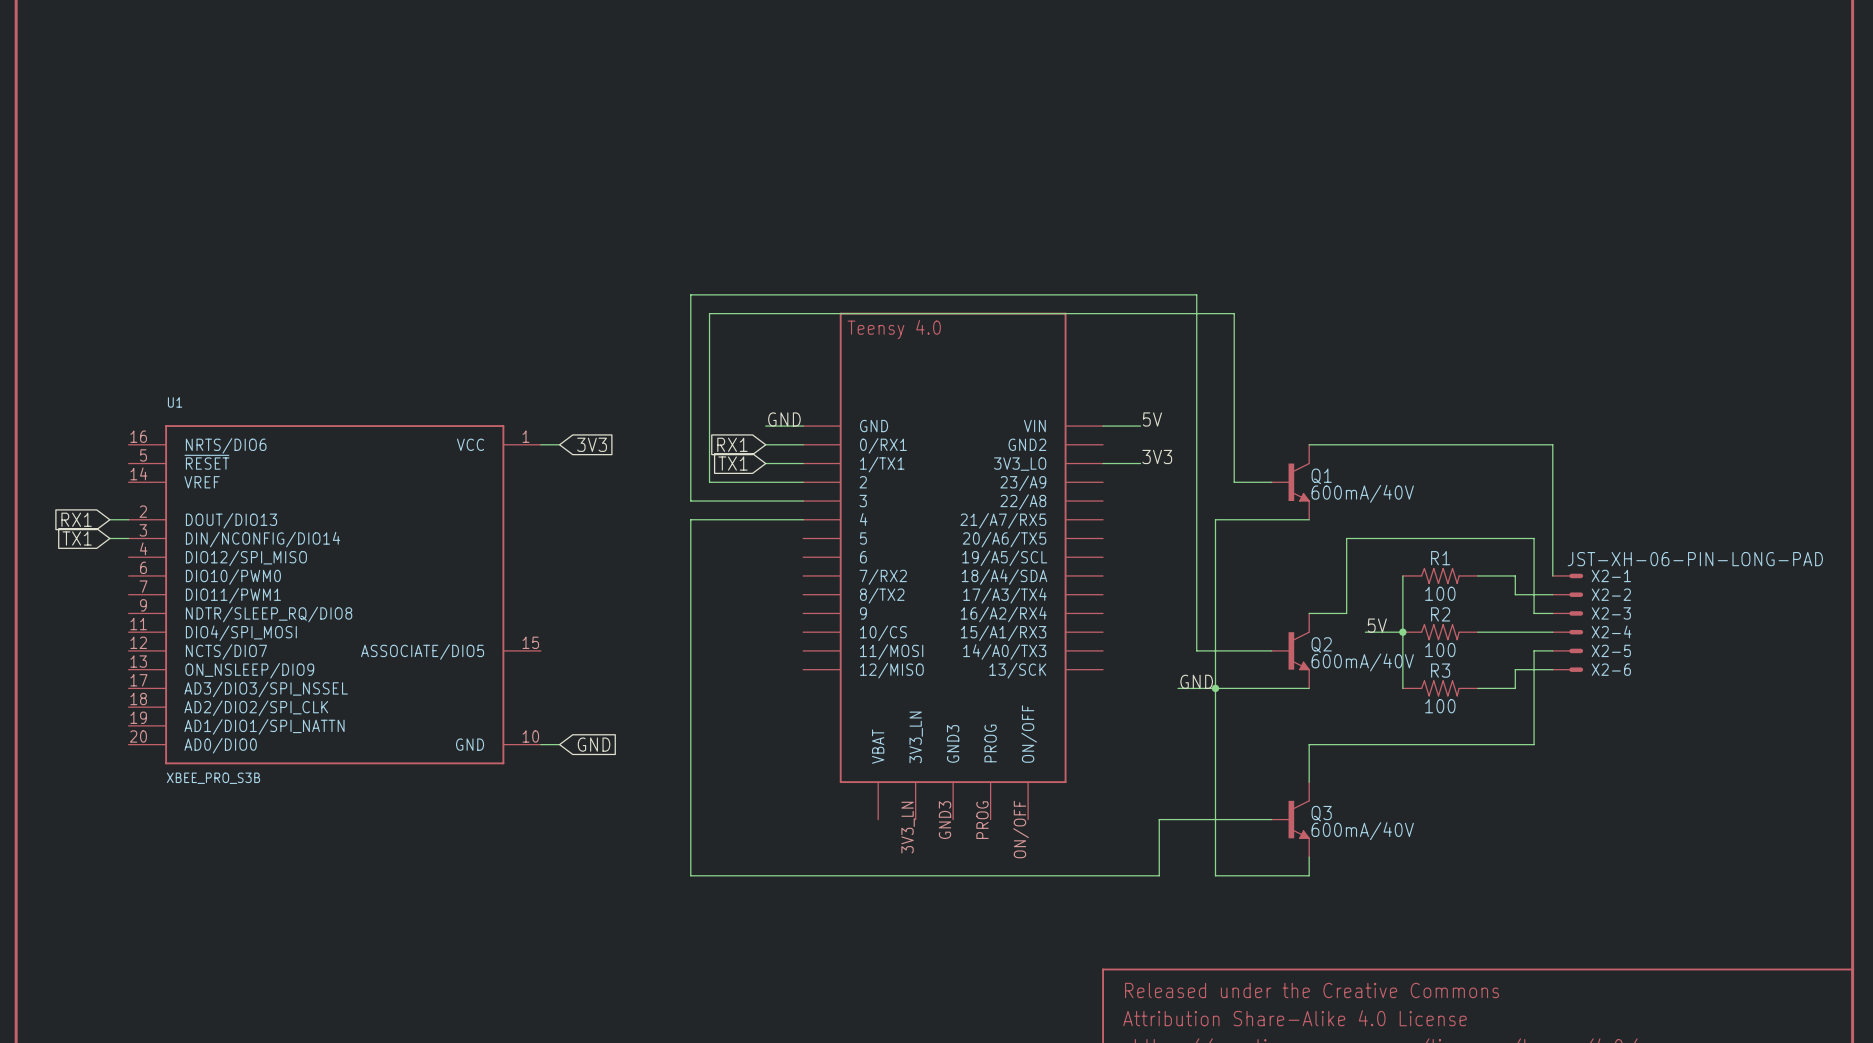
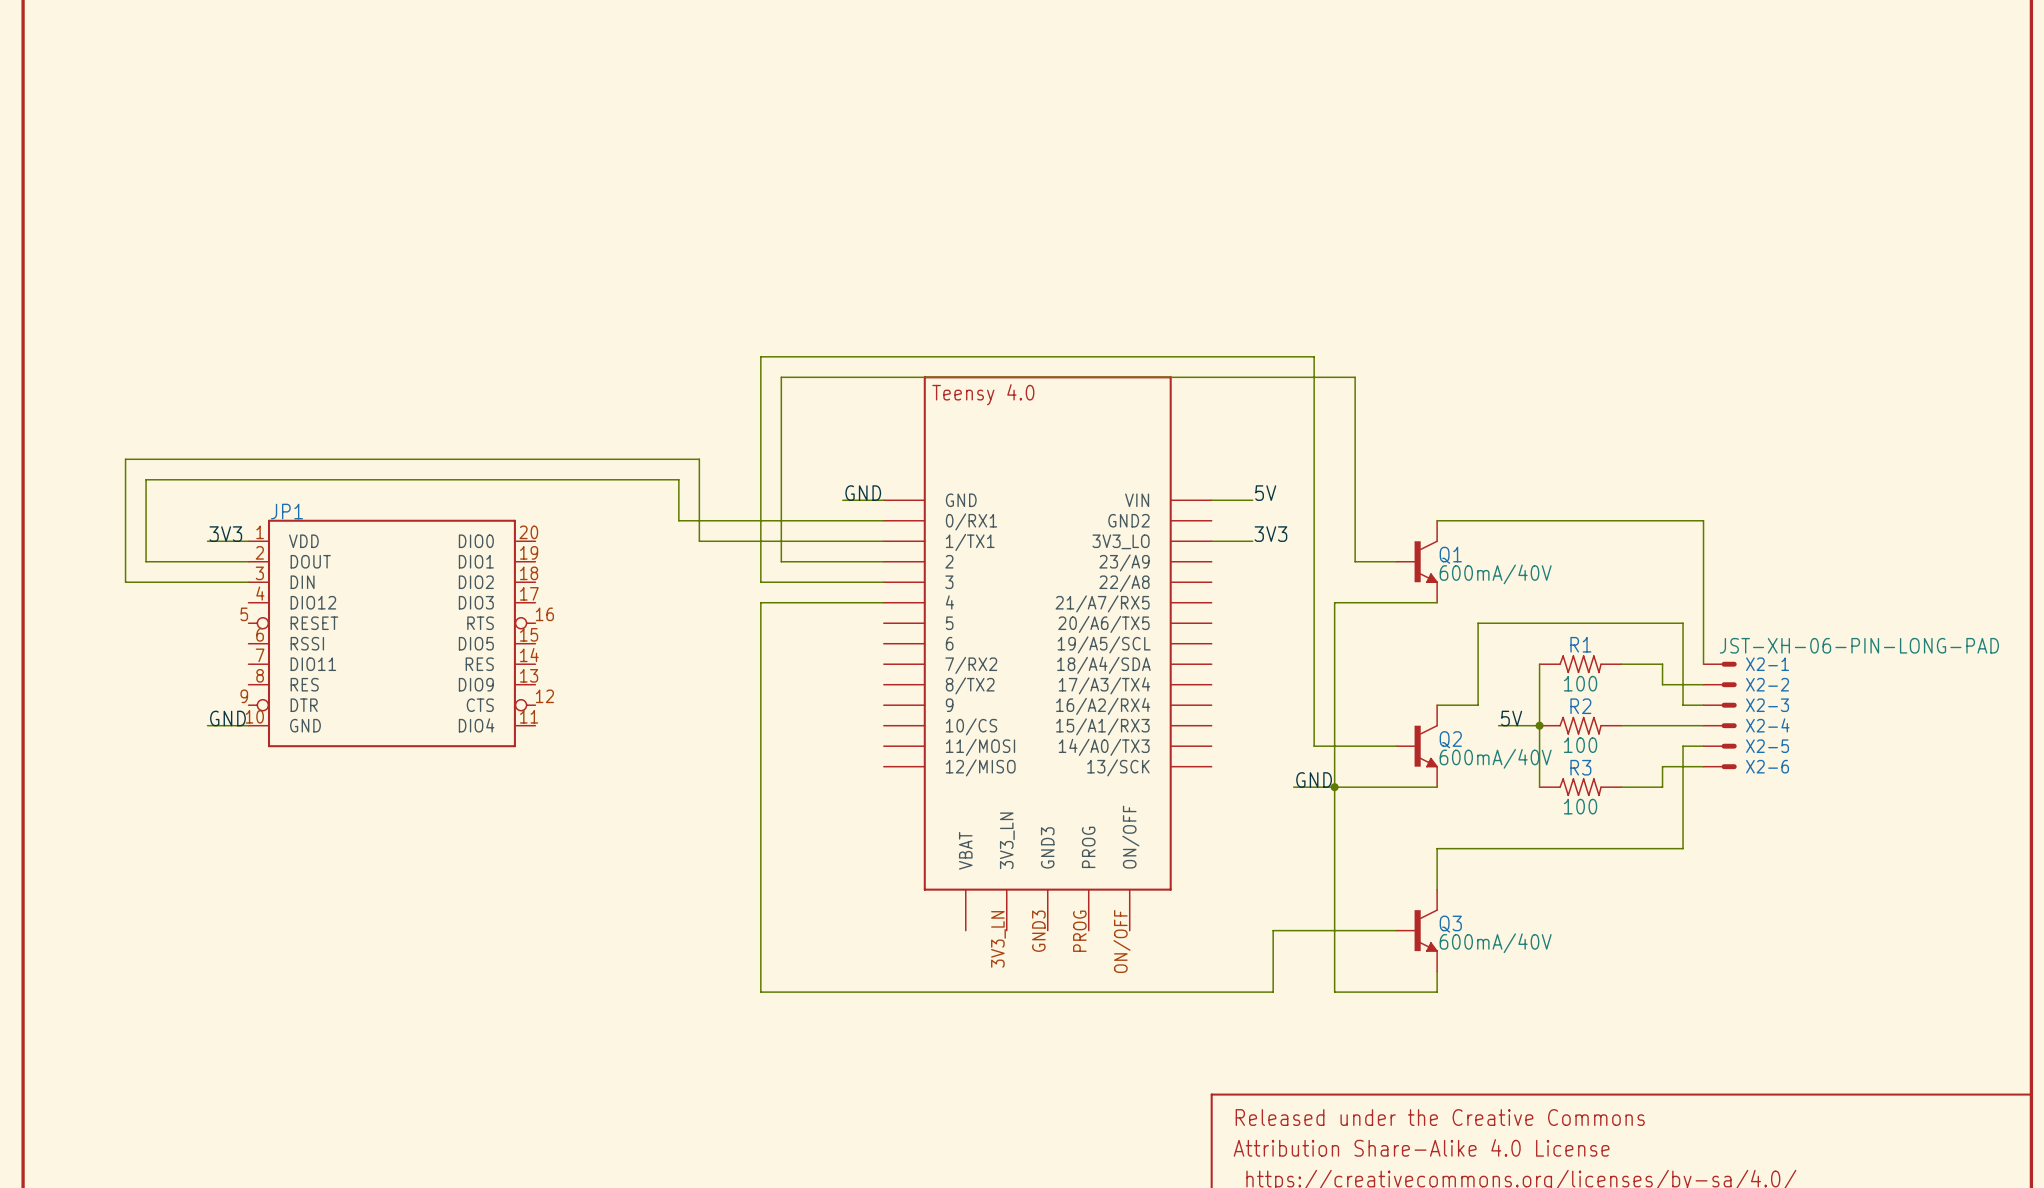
wire: (540, 444) (559, 444) -> none
global label: 3V3 (592, 444) -> none
global label: RX1 (732, 444) -> none
wire: none -> (842, 520) (678, 520) (678, 479) (146, 479) (146, 561) (248, 561)
label: none -> 3V3 (225, 534)
wire: none -> (207, 541) (248, 541)
global label: TX1 (733, 463) -> none
wire: none -> (842, 541) (699, 541) (699, 459) (125, 459) (125, 582) (248, 582)
global label: RX1 (76, 519) -> none
wire: (109, 519) (128, 519) -> none
global label: TX1 (77, 538) -> none
wire: (109, 538) (128, 538) -> none
JP1: none -> (391, 633)
U1: XBEE_PRO_S3B (334, 594) -> none
label: none -> GND (227, 718)
wire: none -> (207, 725) (248, 725)
wire: (540, 744) (559, 744) -> none
global label: GND (594, 744) -> none

